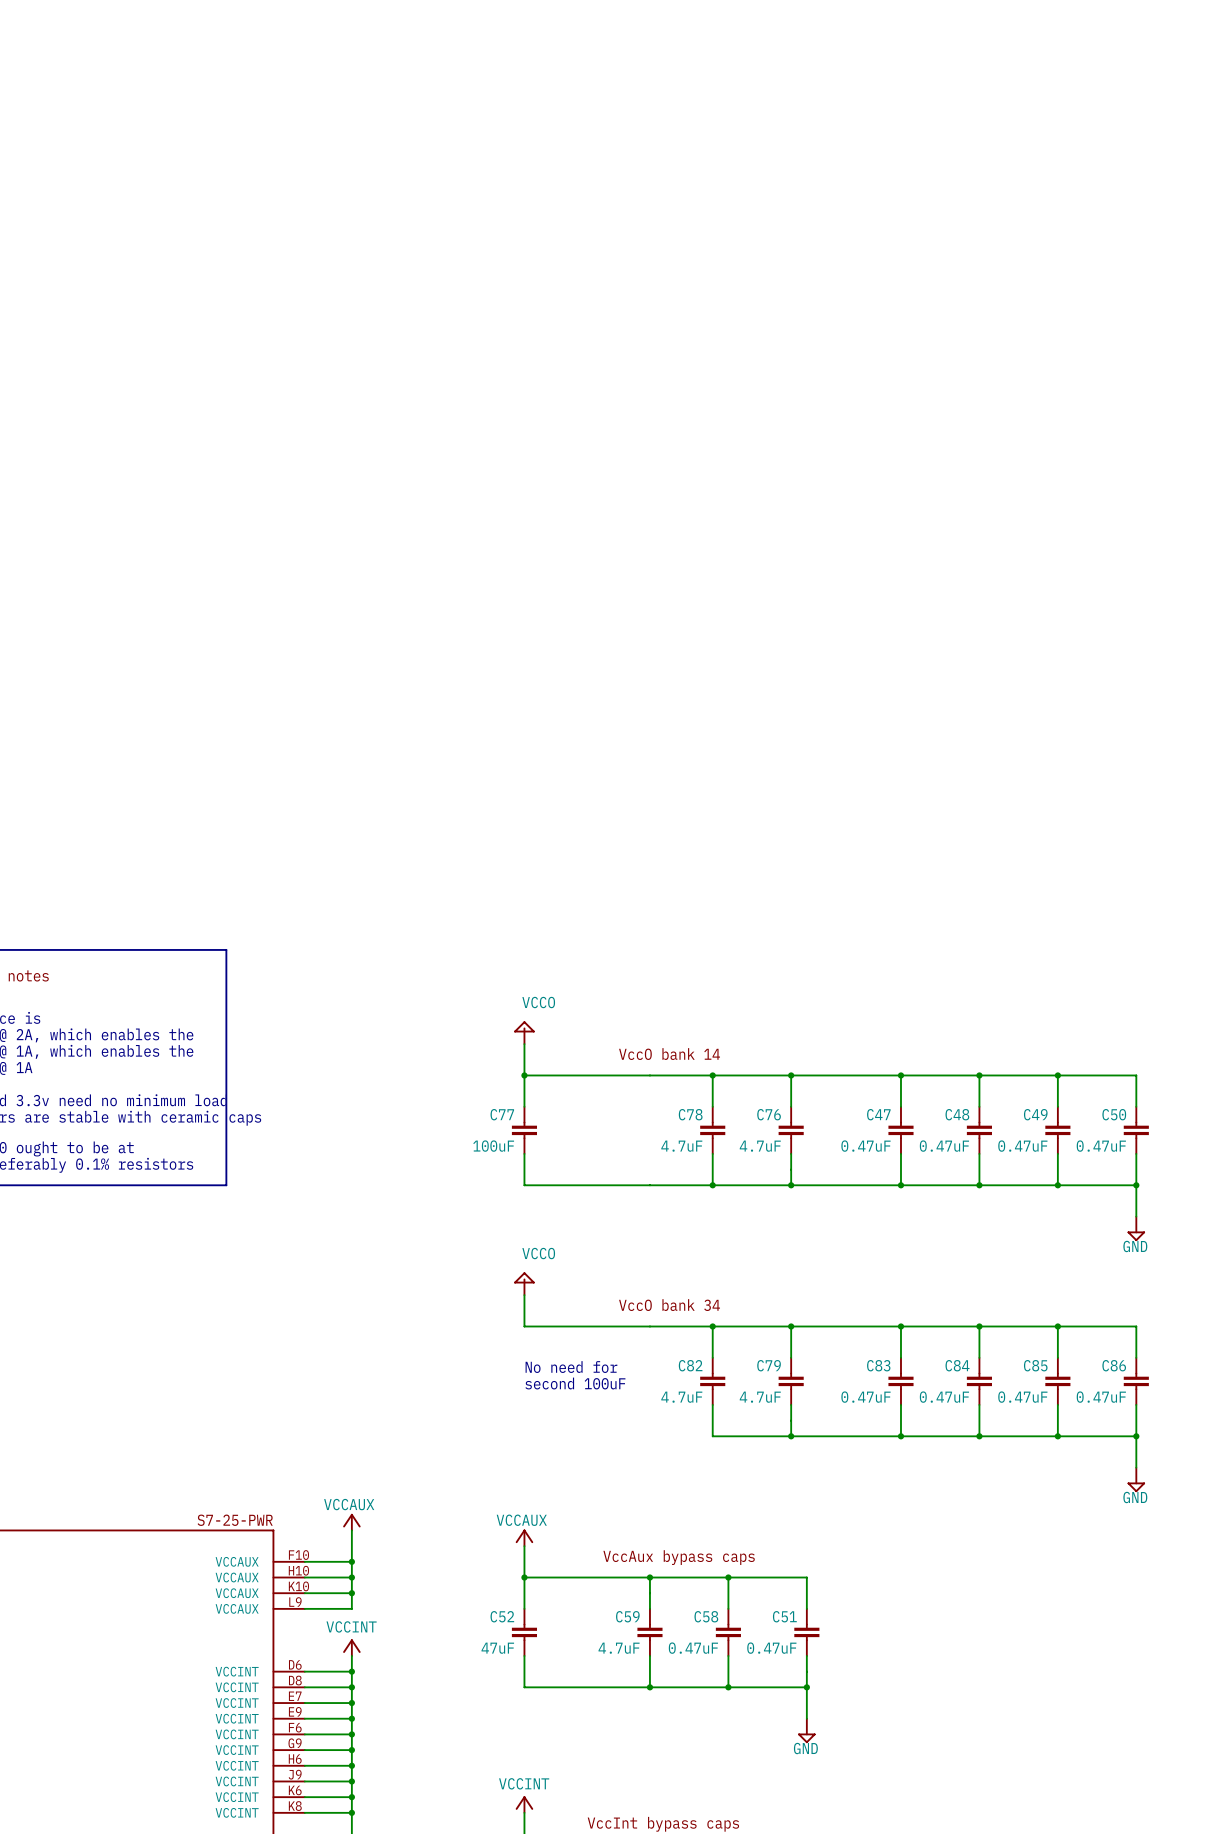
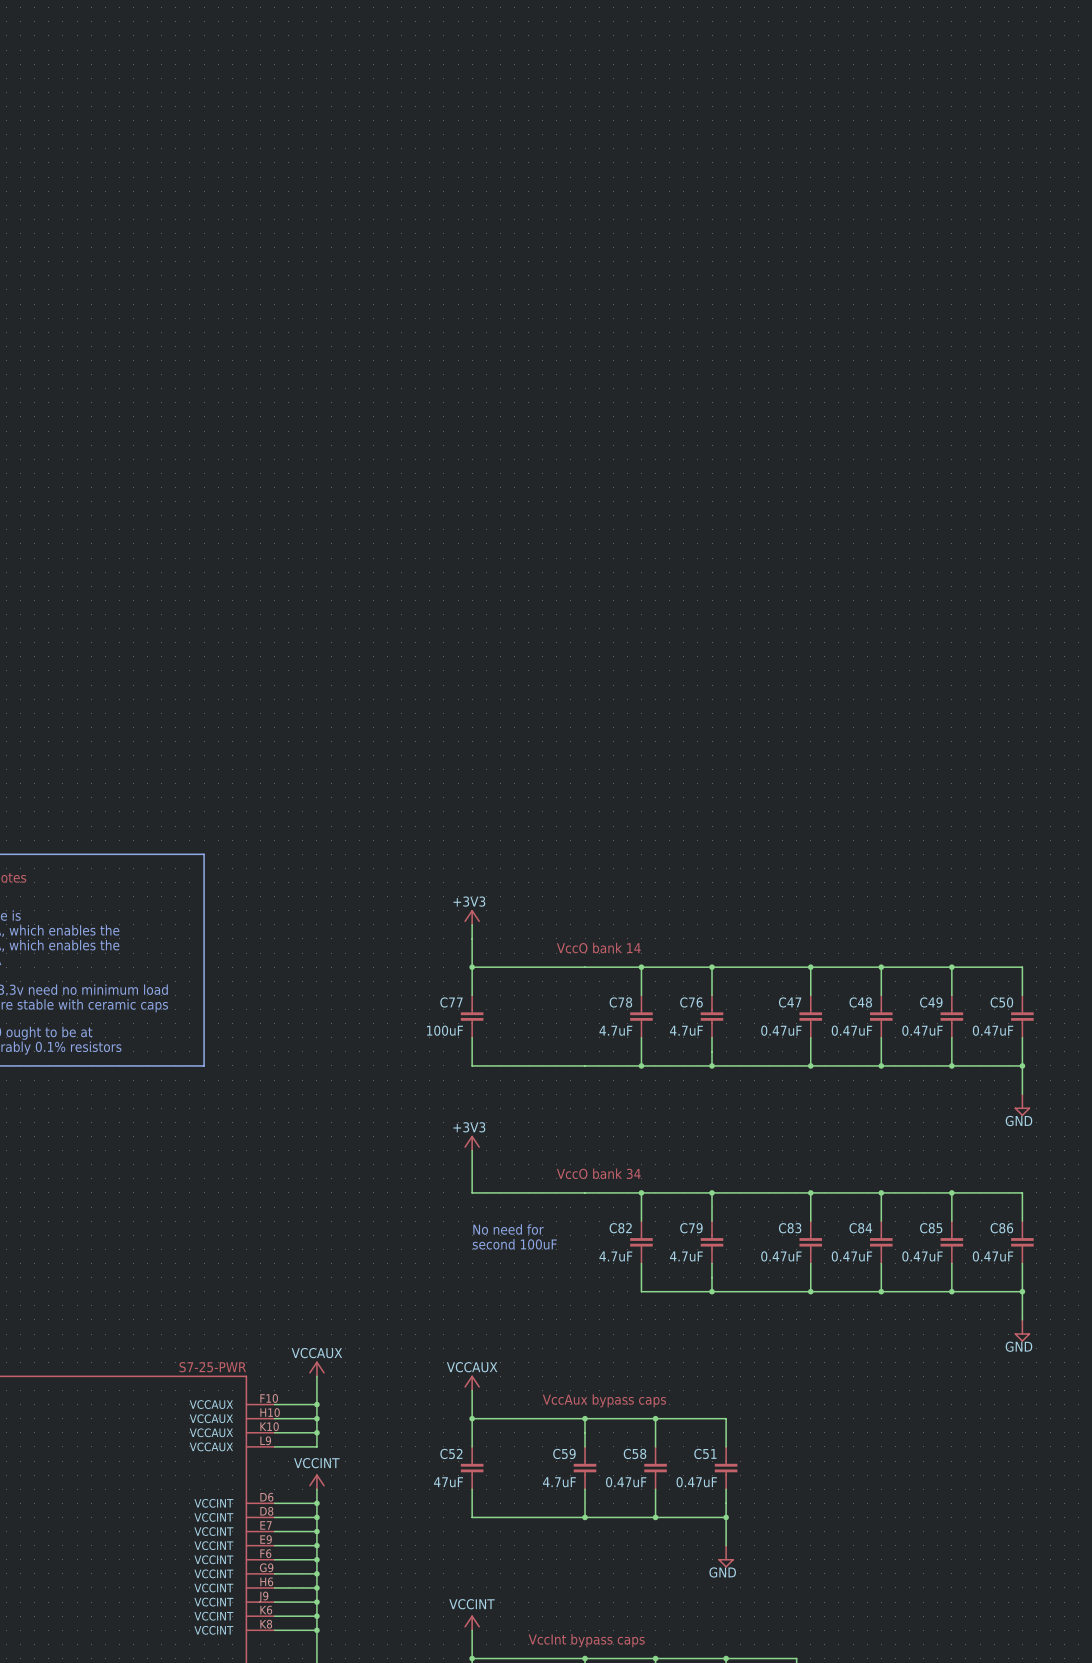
power symbol: none -> +3V3 (472, 917)
power symbol: VCCO (524, 1032) -> none
power symbol: none -> +3V3 (472, 1143)
power symbol: VCCO (524, 1283) -> none

